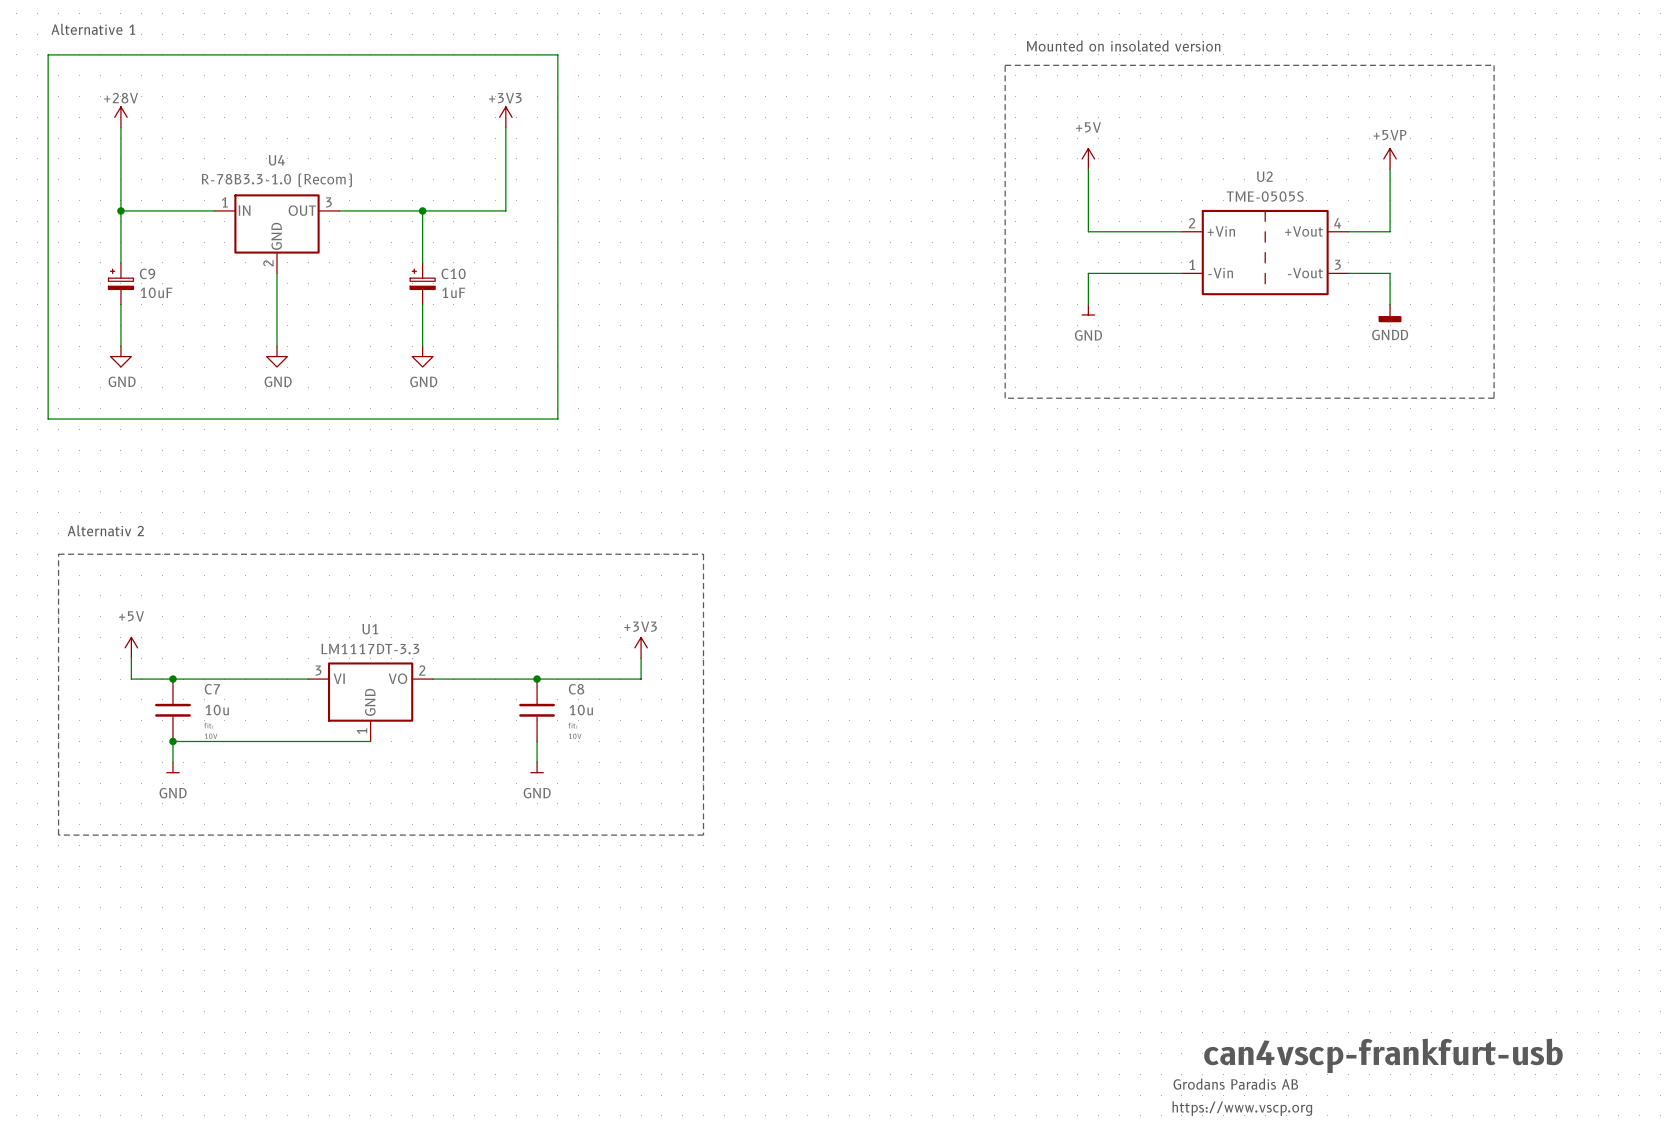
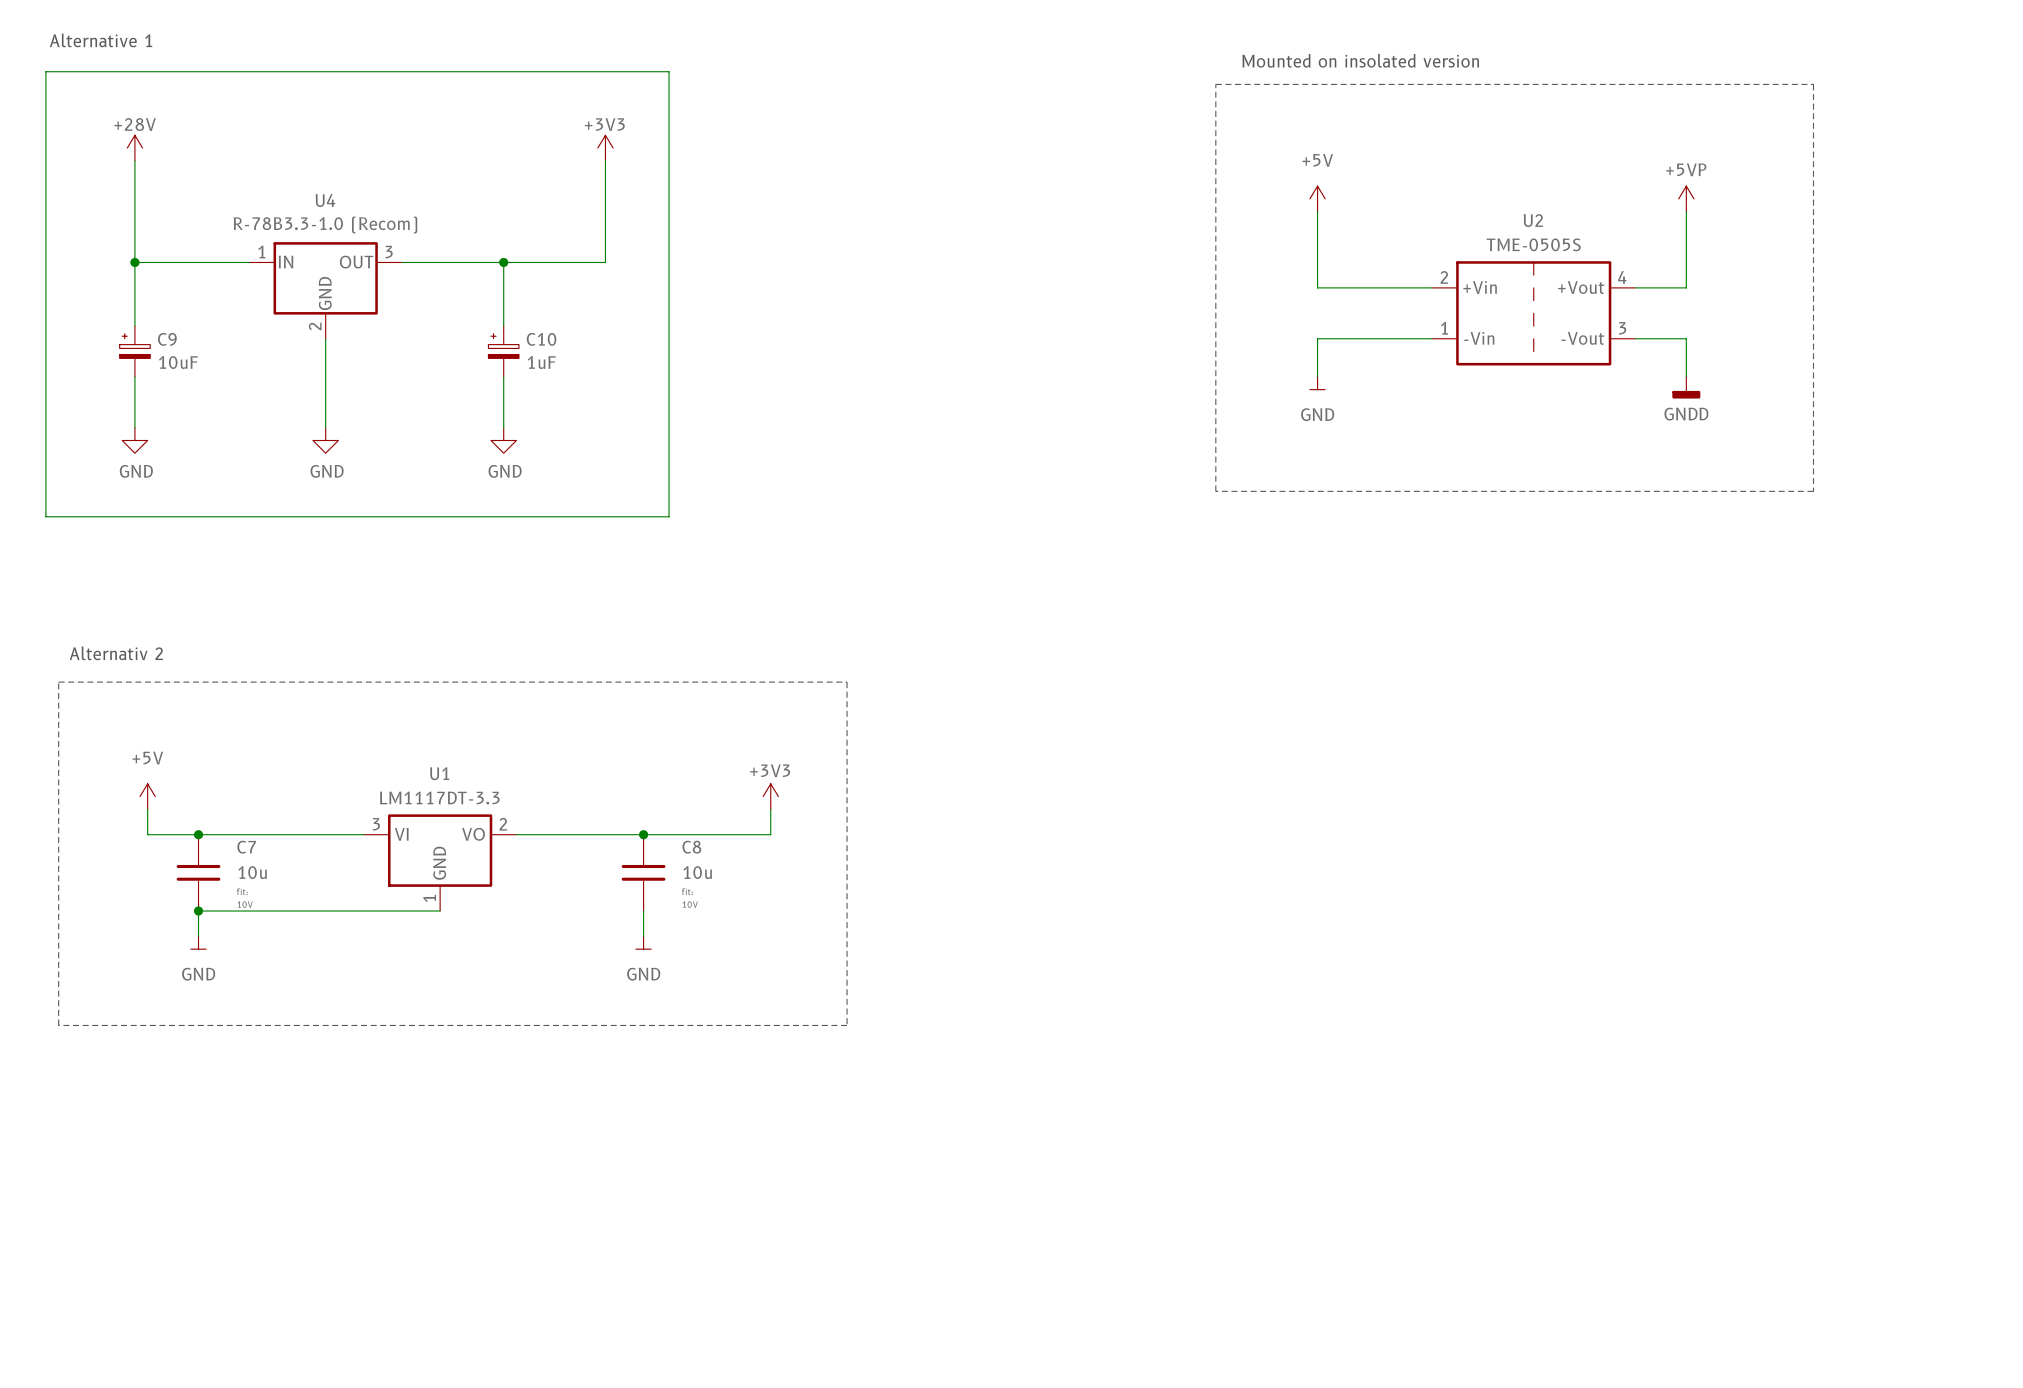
text: can4vscp-frankfurt-usb (1383, 1055) -> none
text: Grodans Paradis AB (1235, 1084) -> none
text: https://www.vscp.org (1242, 1108) -> none

